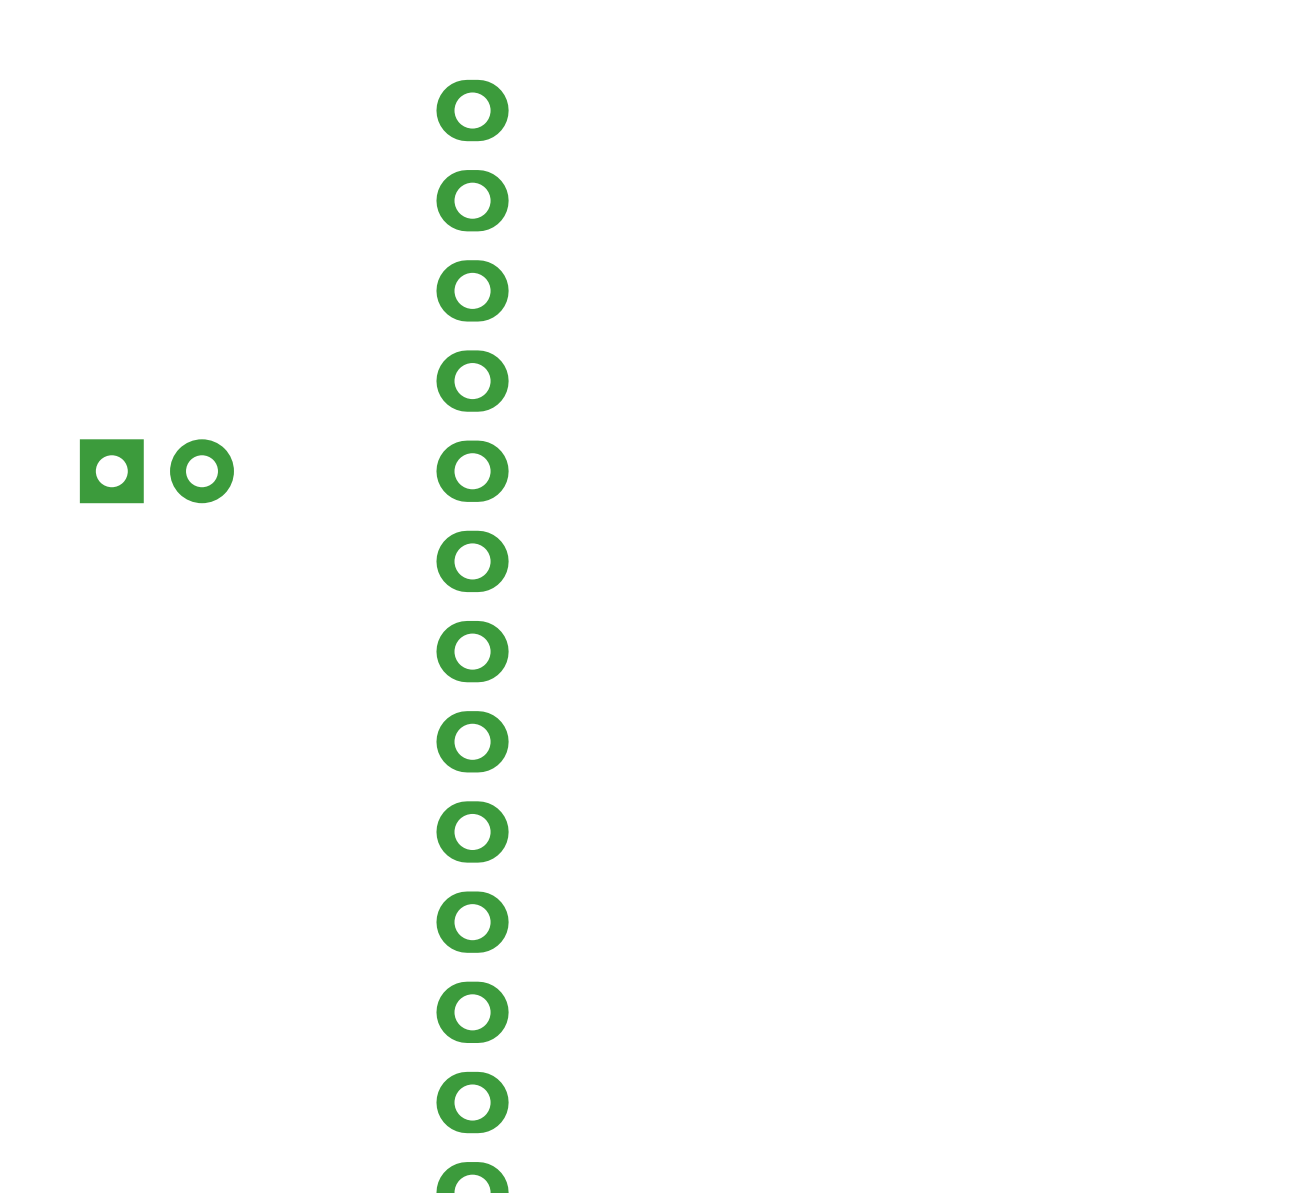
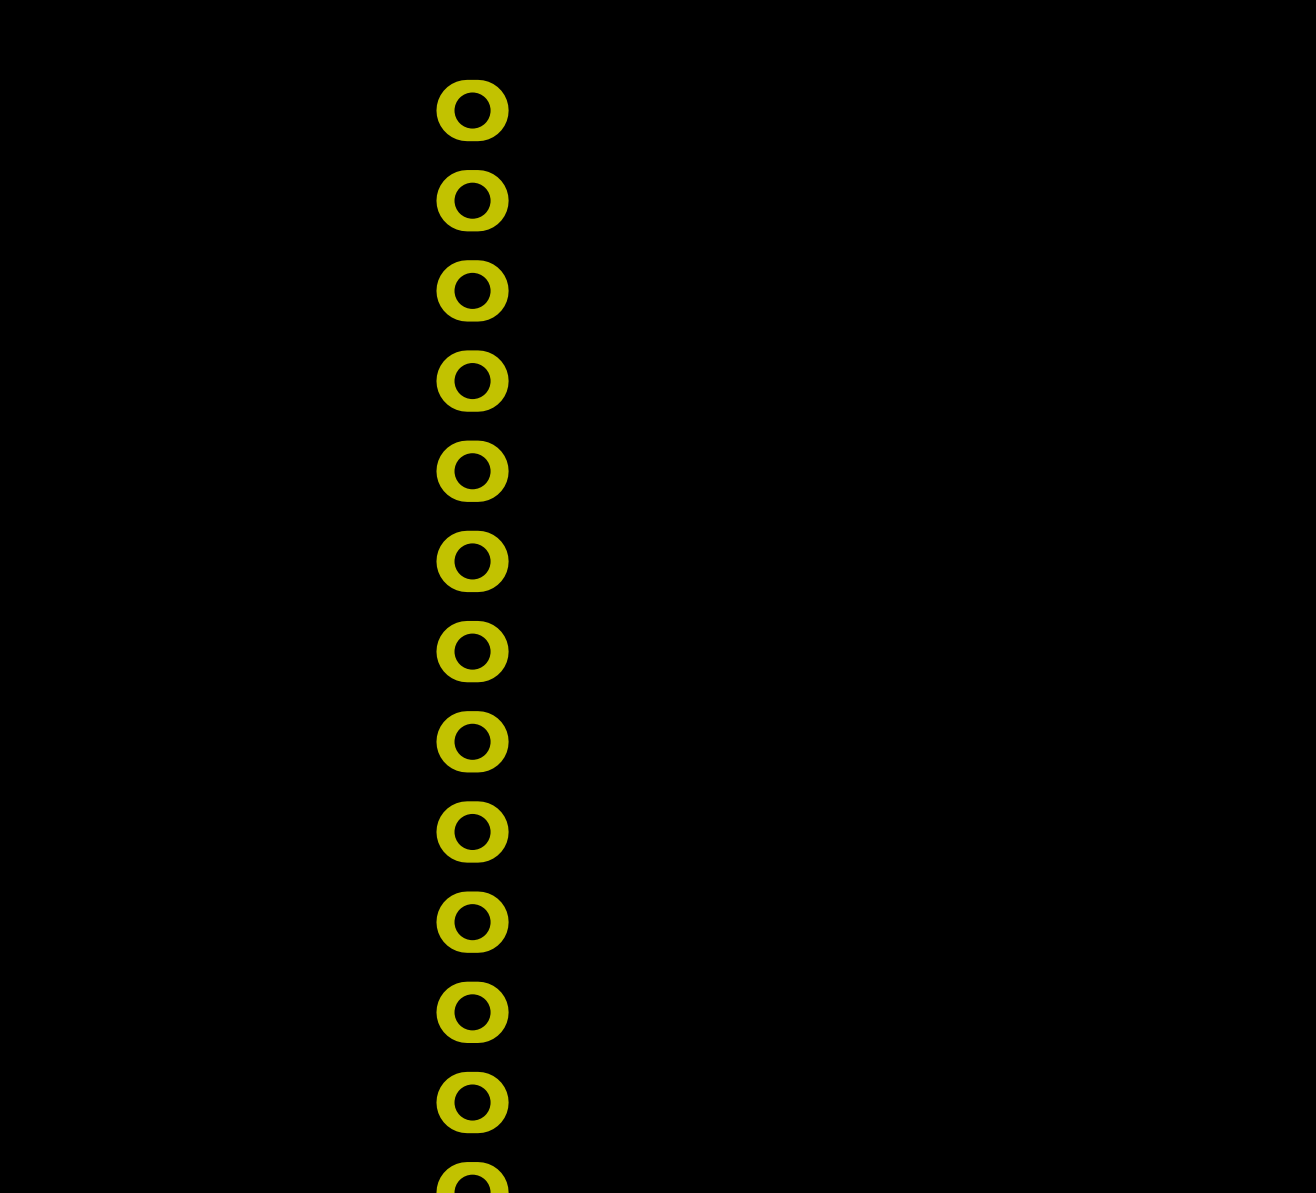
part: (156, 471) -> none

